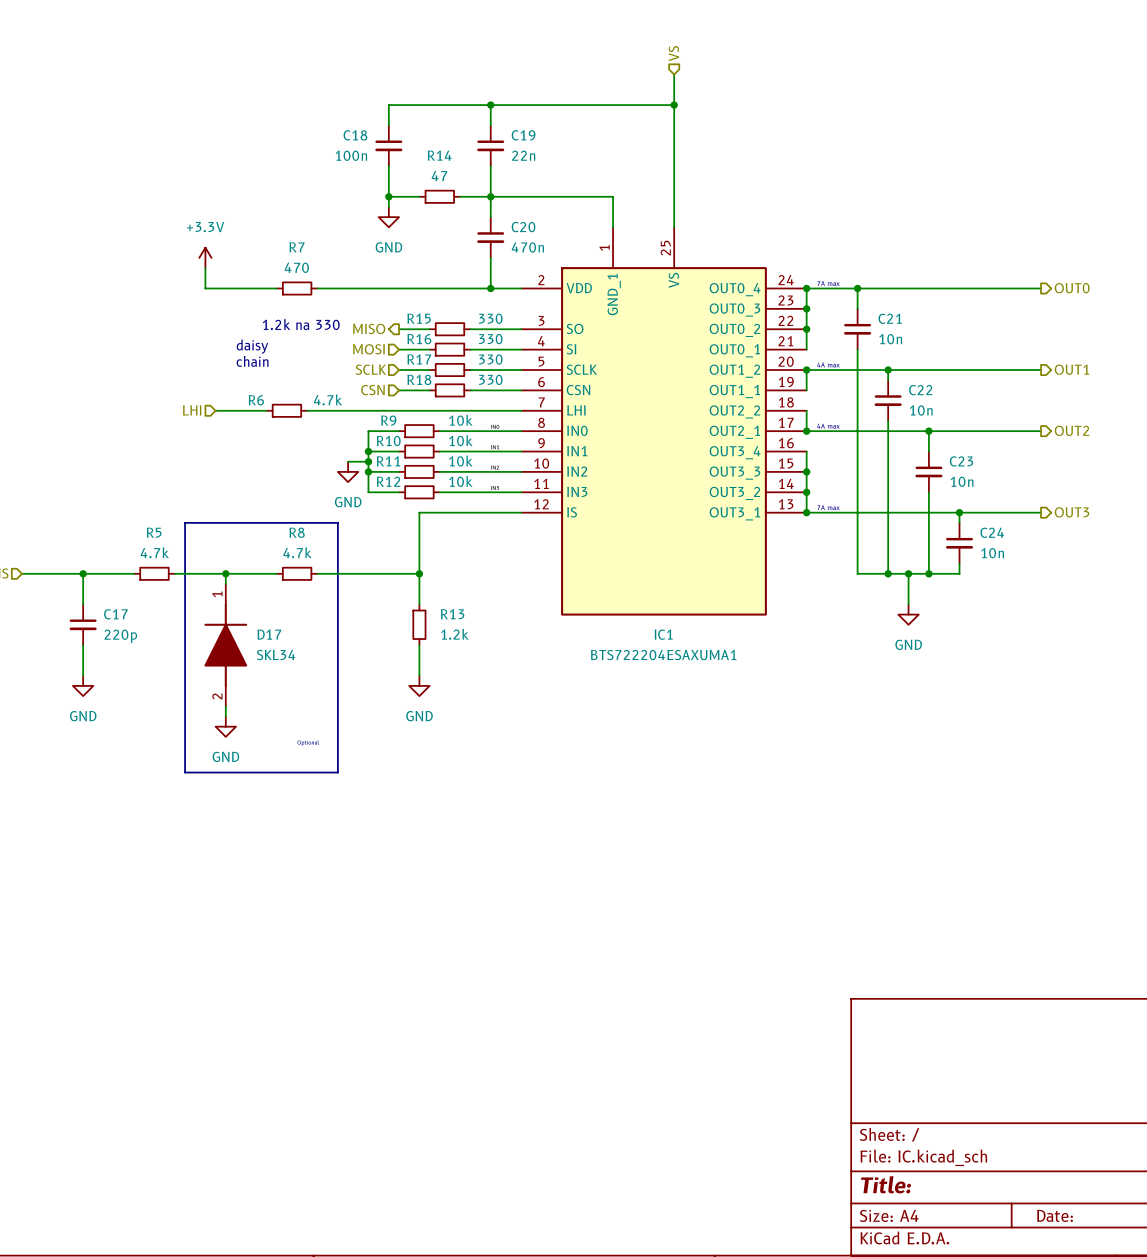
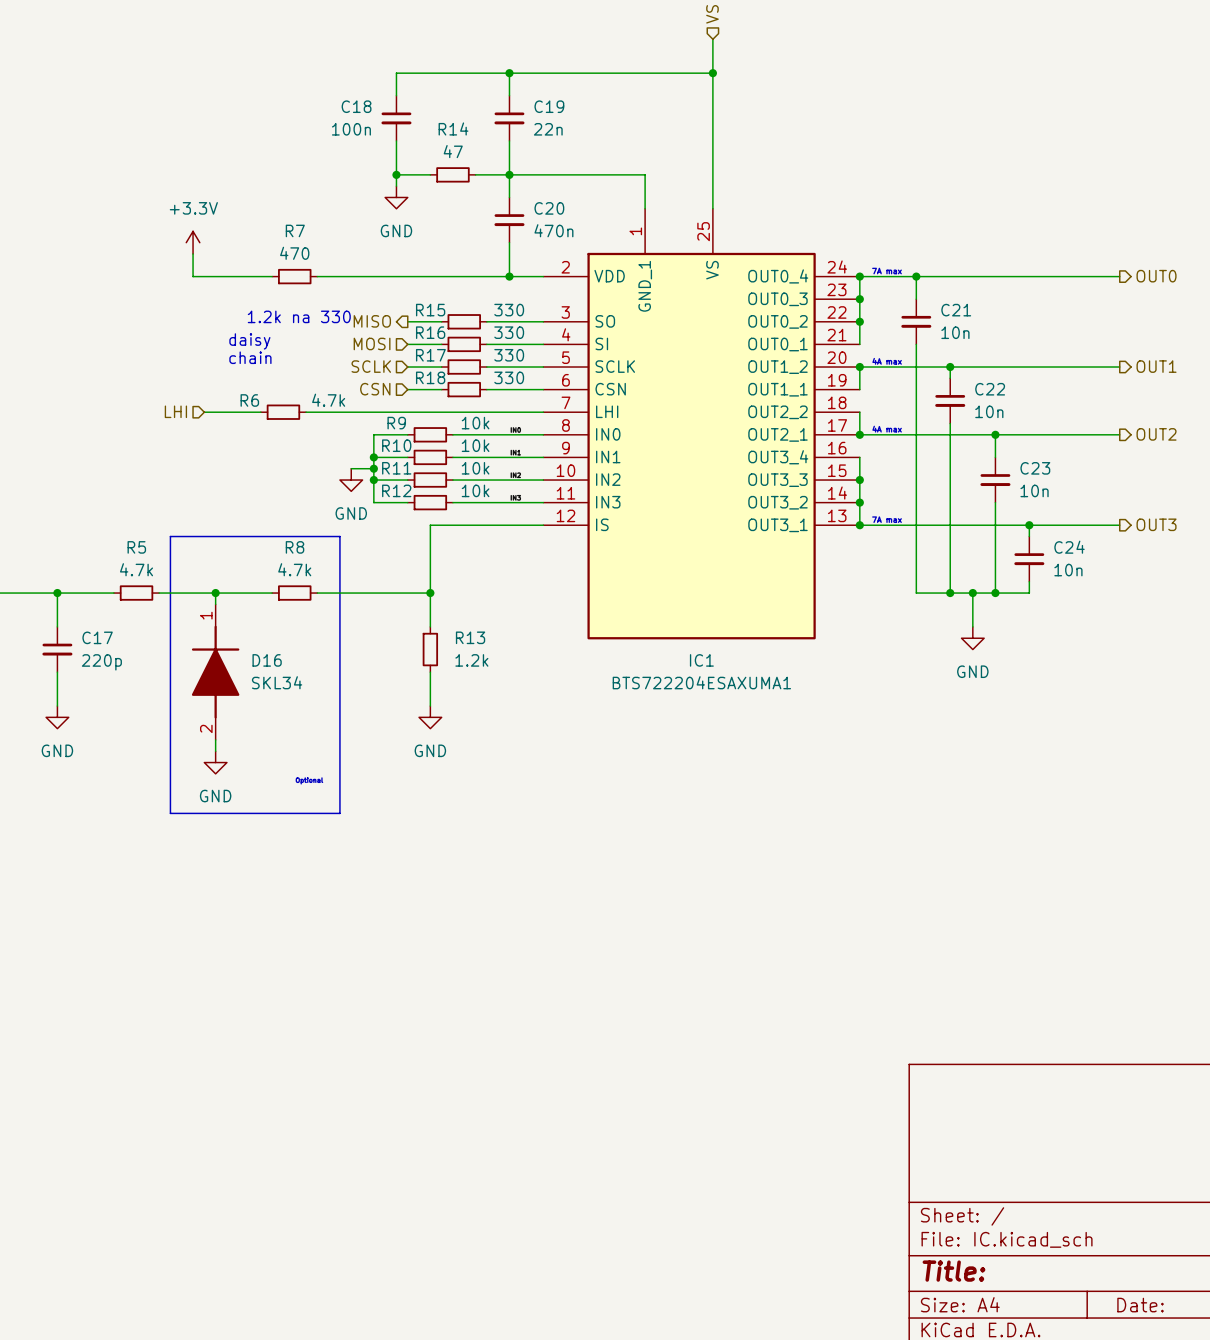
D17 name: D17 (269, 634) -> D16 (267, 660)

